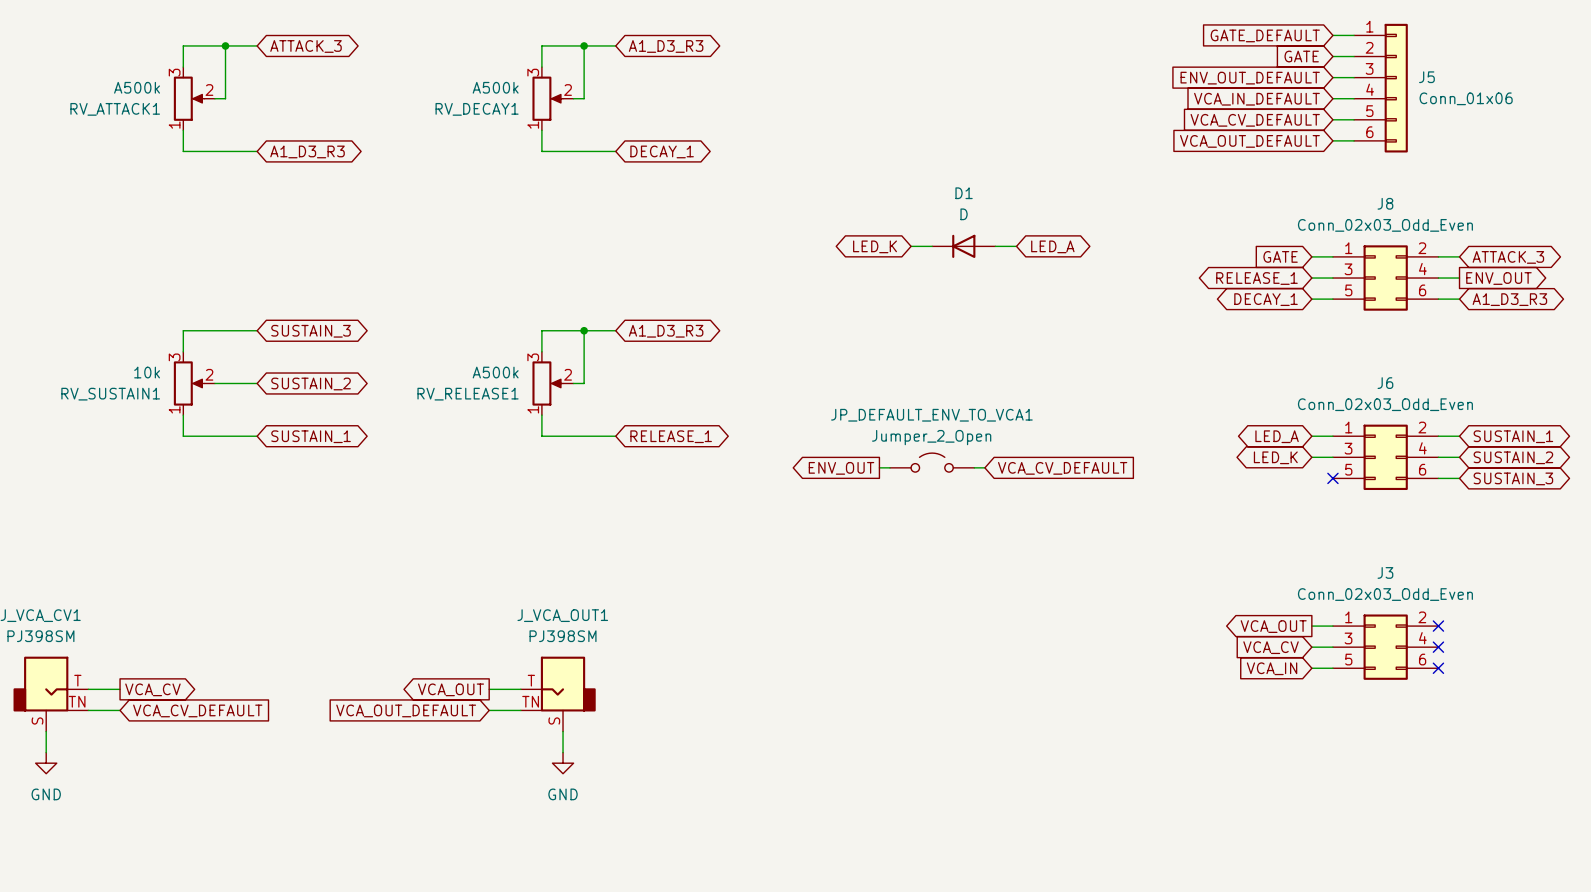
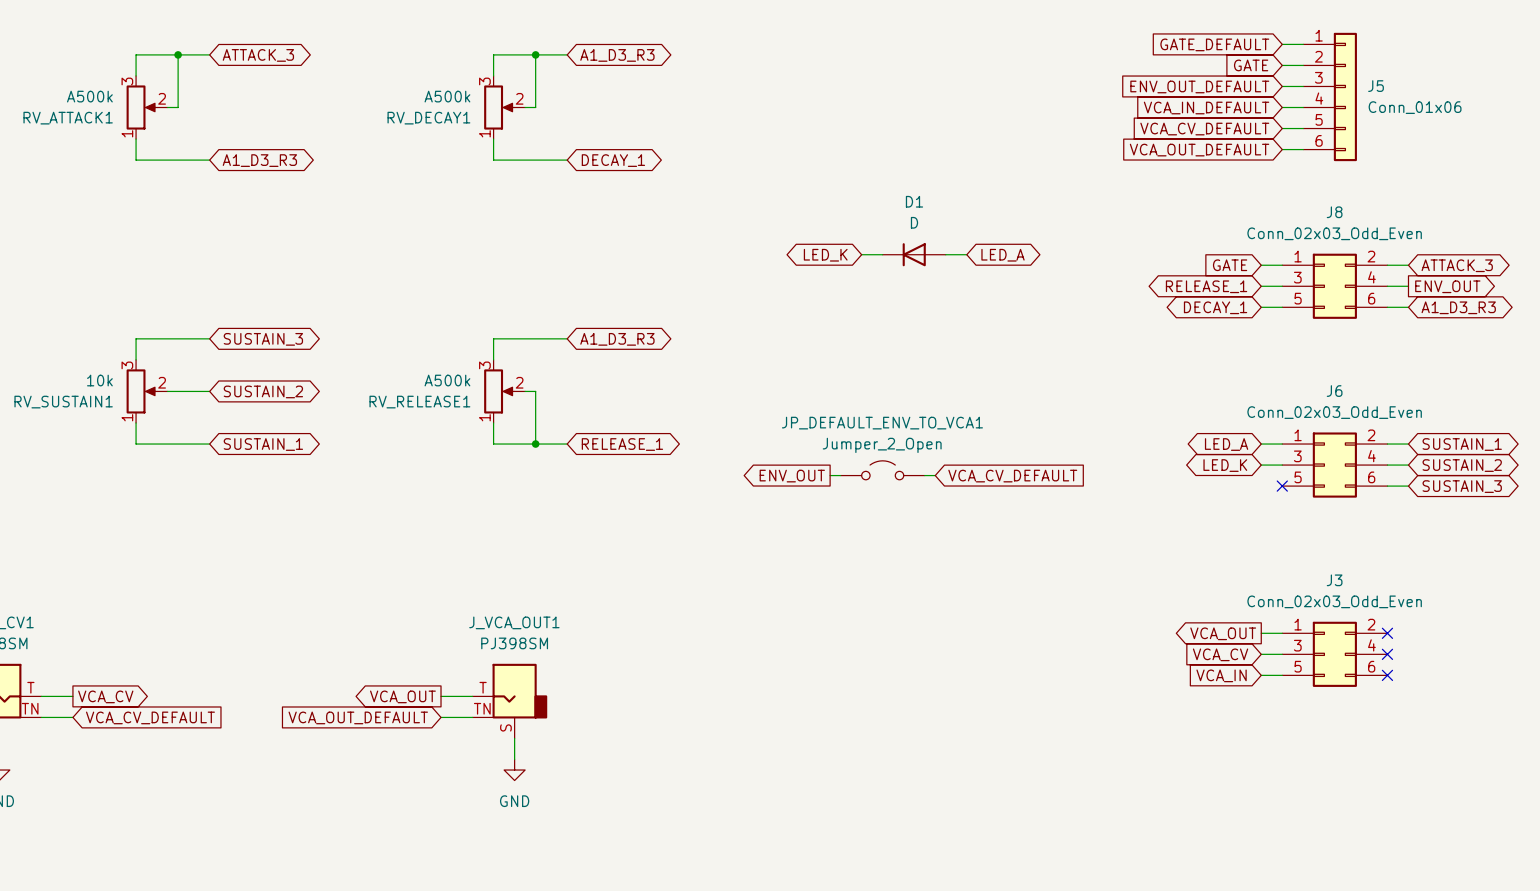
wire: (584, 330) (584, 383) -> (535, 444) (535, 391)
junction: (584, 330) -> none
junction: none -> (535, 444)

